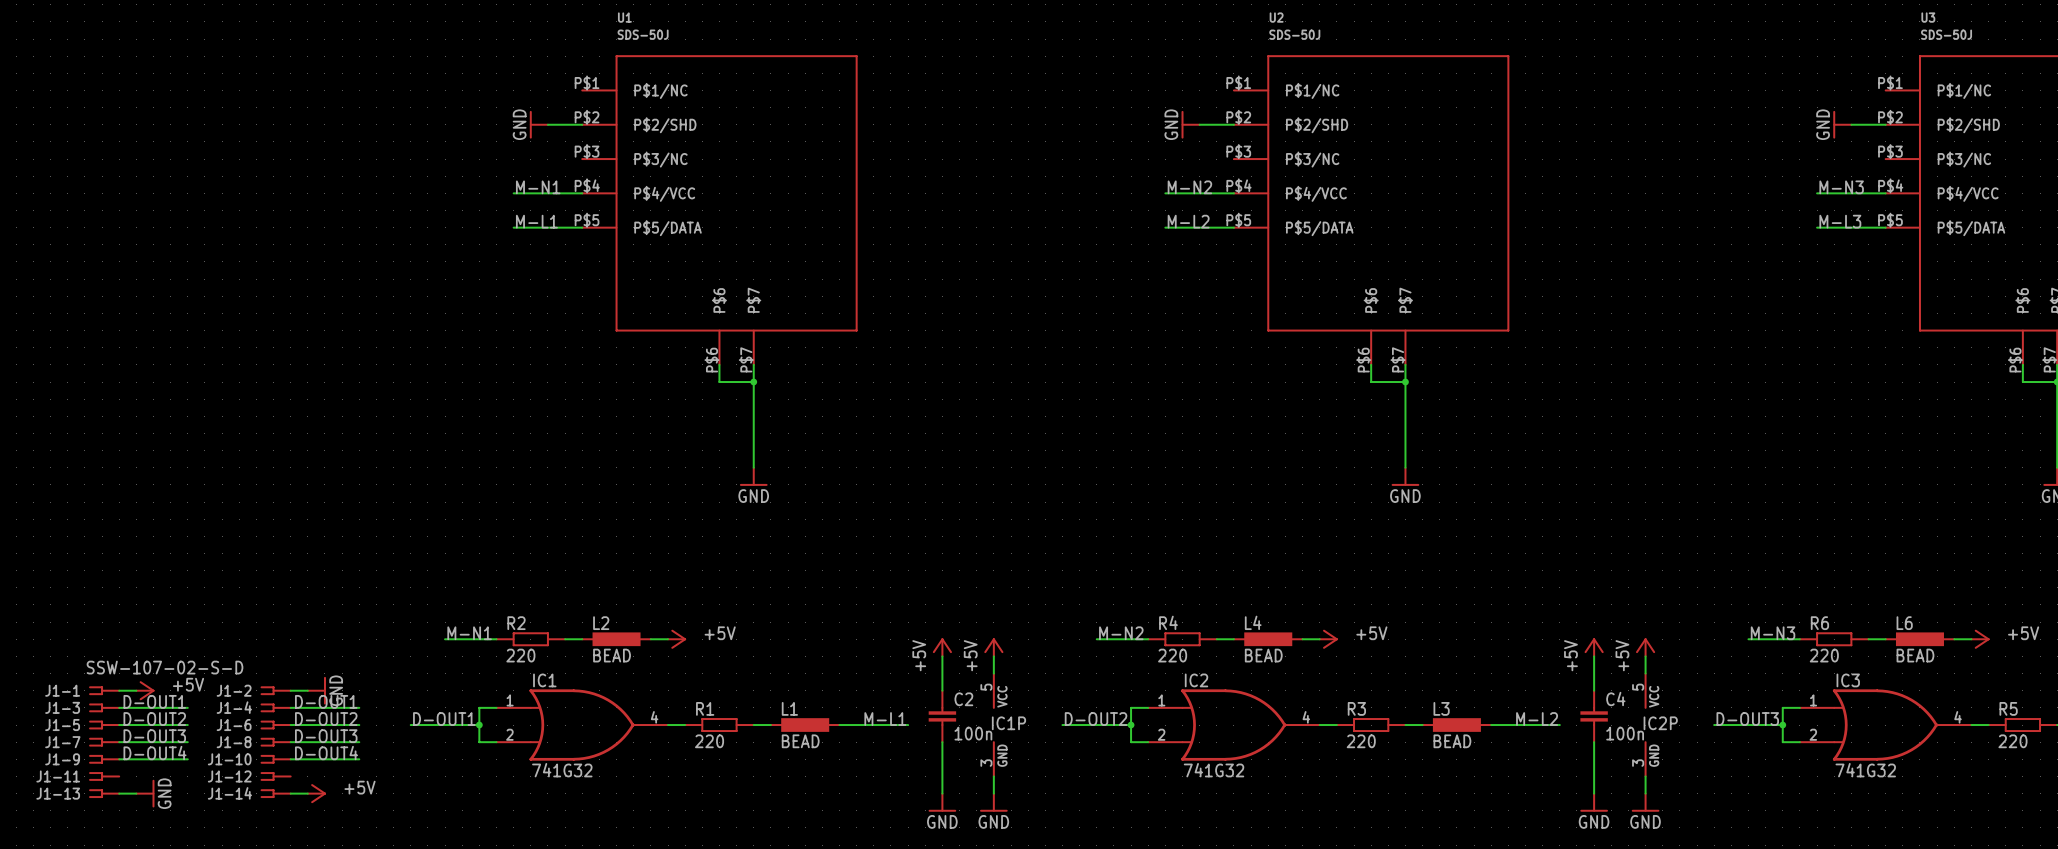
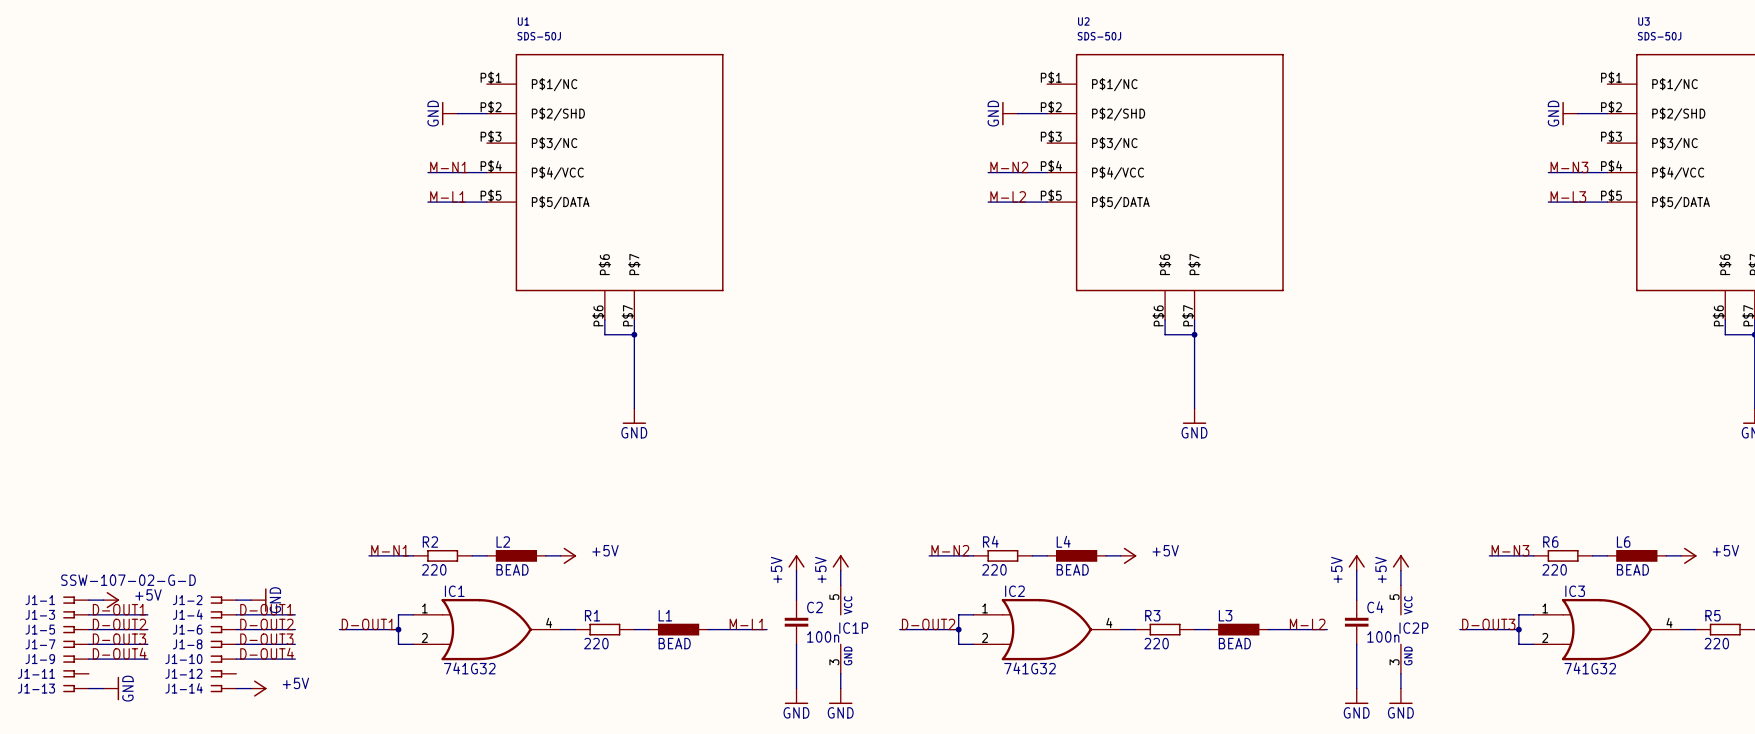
J1-1 value: SSW-107-02-S-D (165, 667) -> SSW-107-02-G-D (128, 580)

